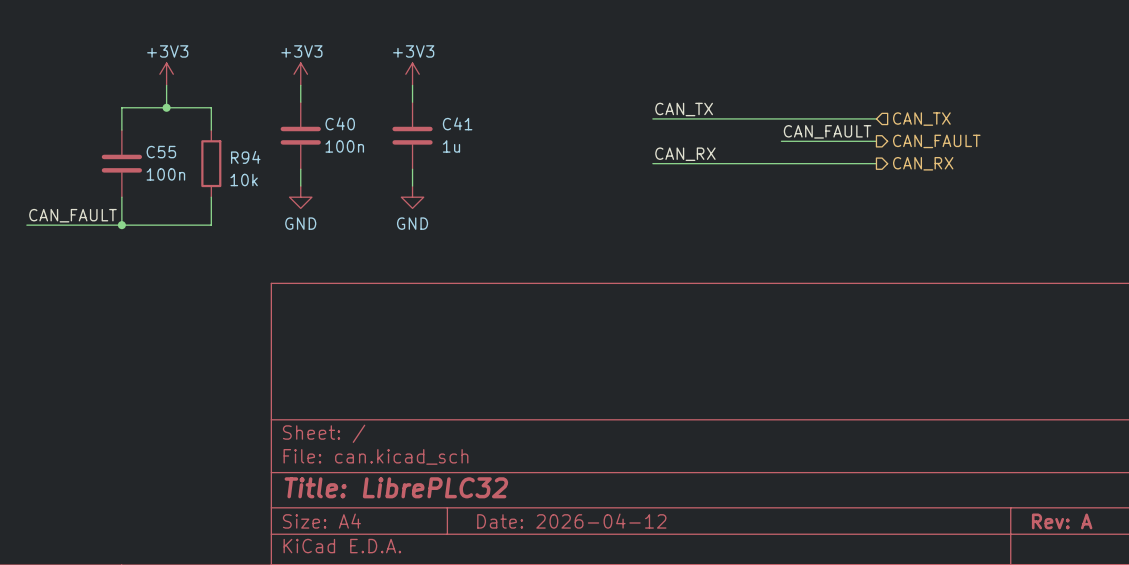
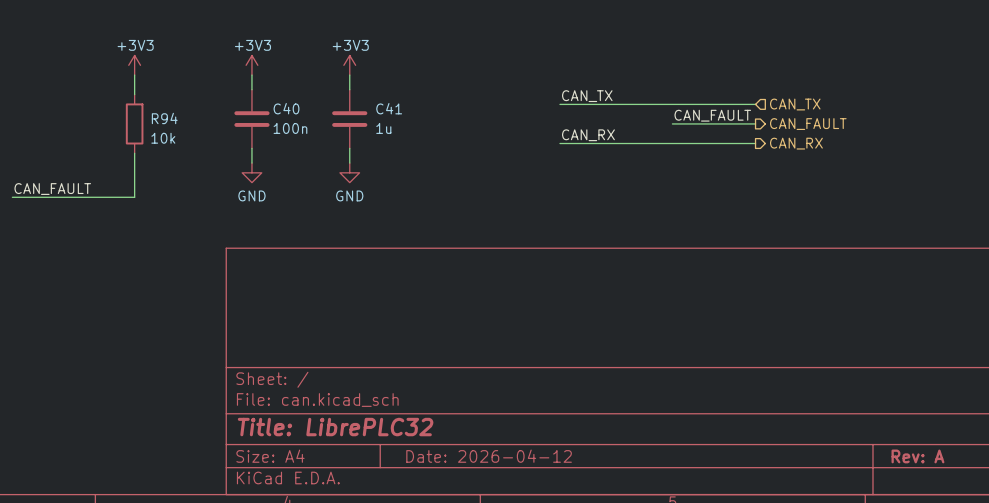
junction: (166, 107) -> none
wire: (121, 130) (121, 107) (211, 107) (211, 130) -> none
C55: 100n (121, 163) -> none
R94 position: (211, 163) -> (134, 123)
wire: (121, 197) (121, 225) -> none
wire: (211, 197) (211, 225) (166, 225) -> (134, 153) (134, 197)
junction: (121, 225) -> none

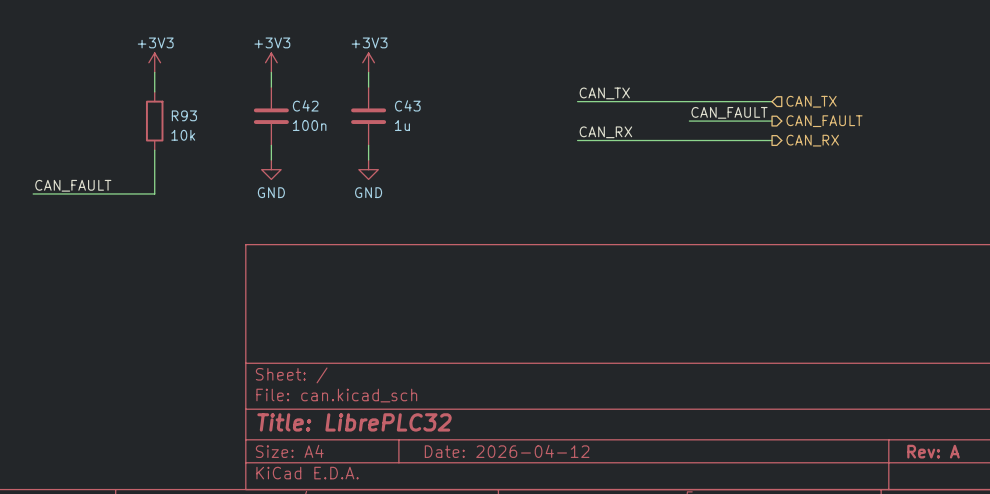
C40 name: C40 (286, 108) -> C42 (305, 105)
C41 name: C41 (389, 108) -> C43 (407, 105)
R94 name: R94 (164, 118) -> R93 (184, 115)

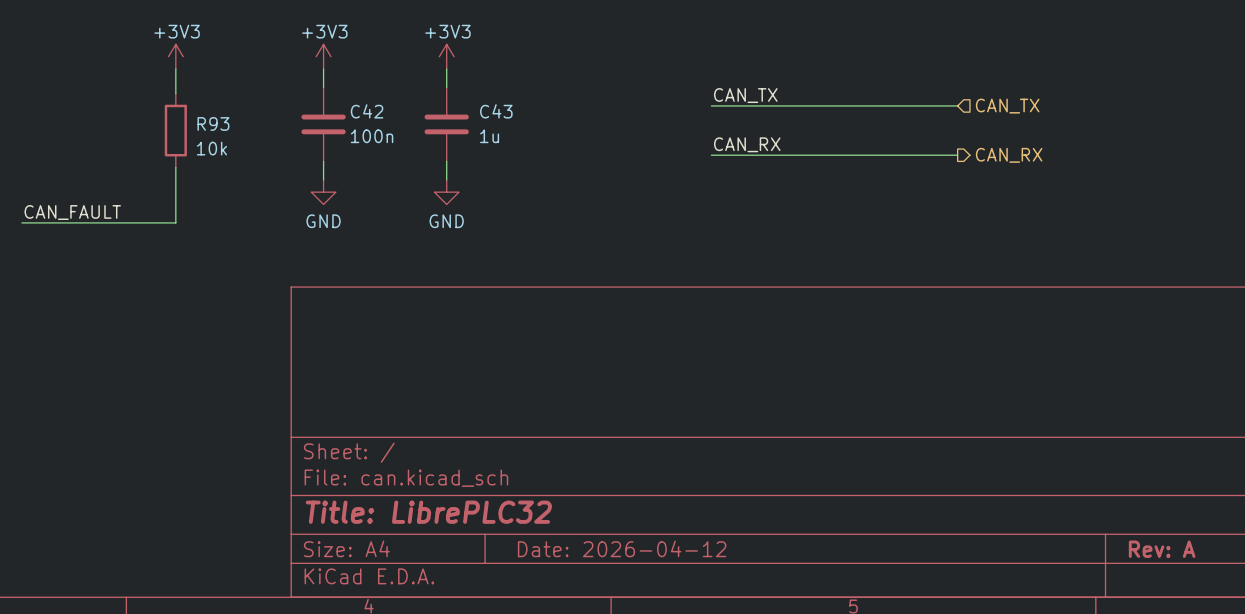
label: CAN_FAULT (729, 112) -> none
wire: (689, 121) (772, 121) -> none
hierarchical label: CAN_FAULT (824, 121) -> none

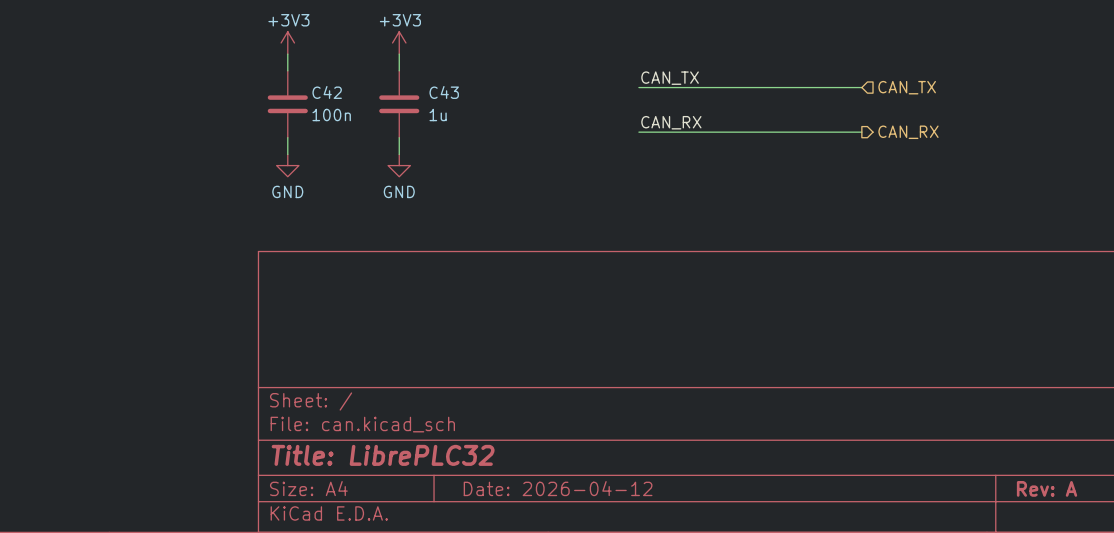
power symbol: +3V3 (175, 56) -> none
wire: (175, 69) (175, 93) -> none
R93: 10k (175, 130) -> none
wire: (175, 167) (175, 222) (21, 222) -> none
label: CAN_FAULT (72, 212) -> none

